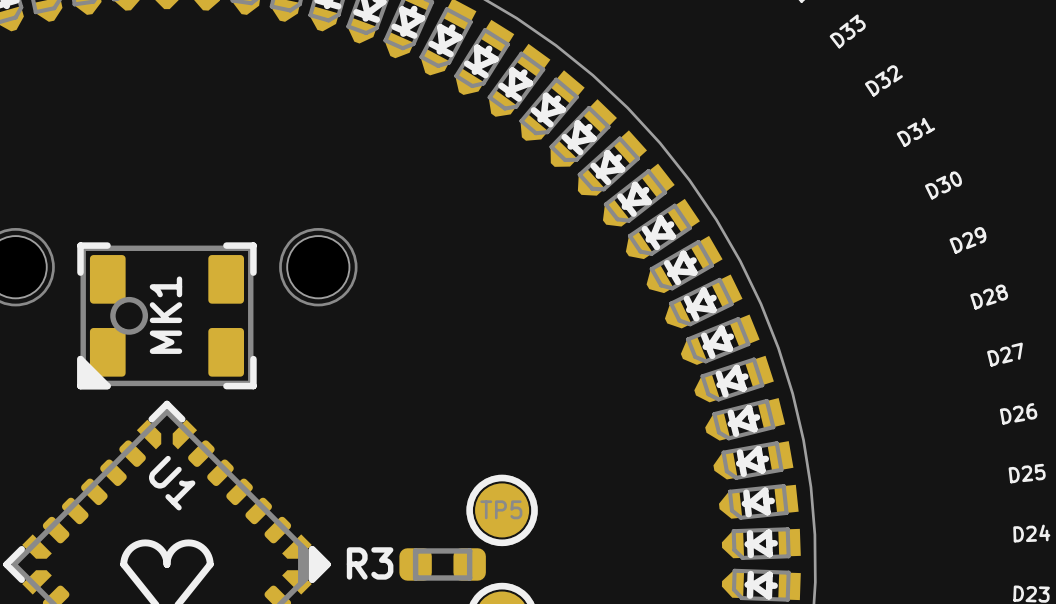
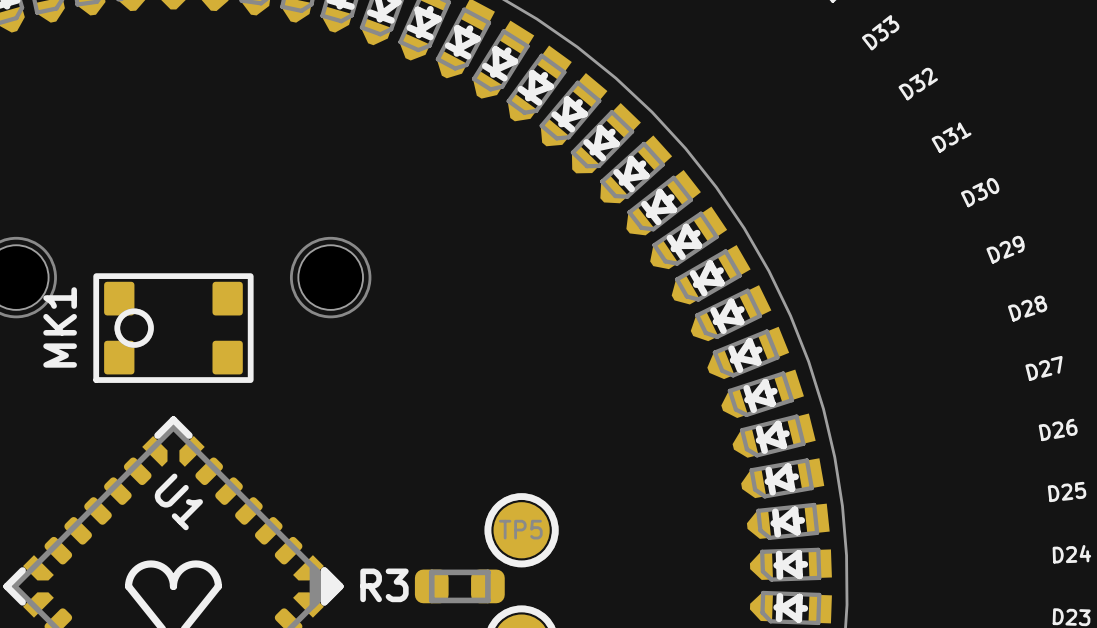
MK1 footprint: [77, 242, 257, 390] -> [93, 273, 254, 383]

